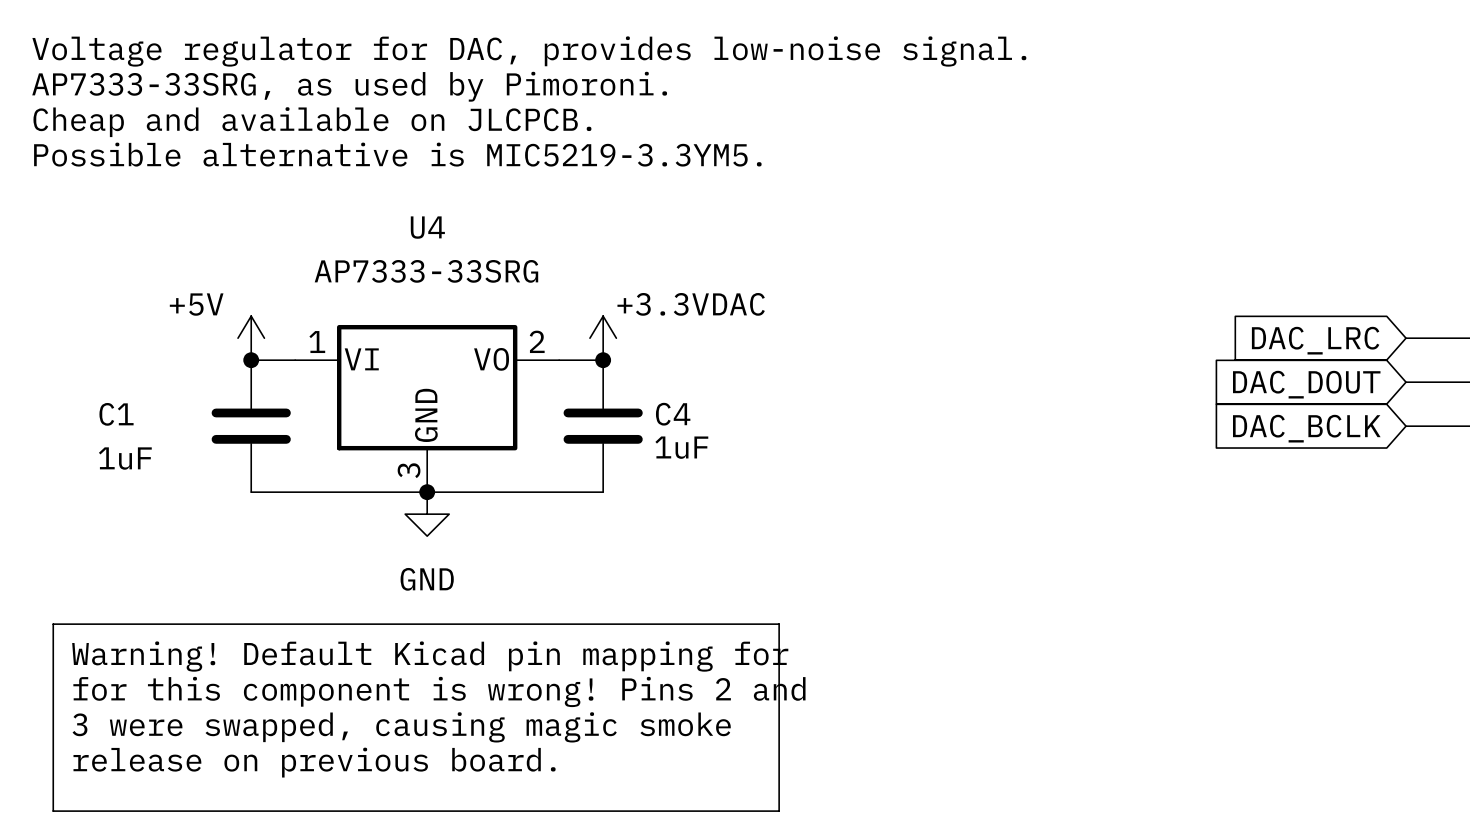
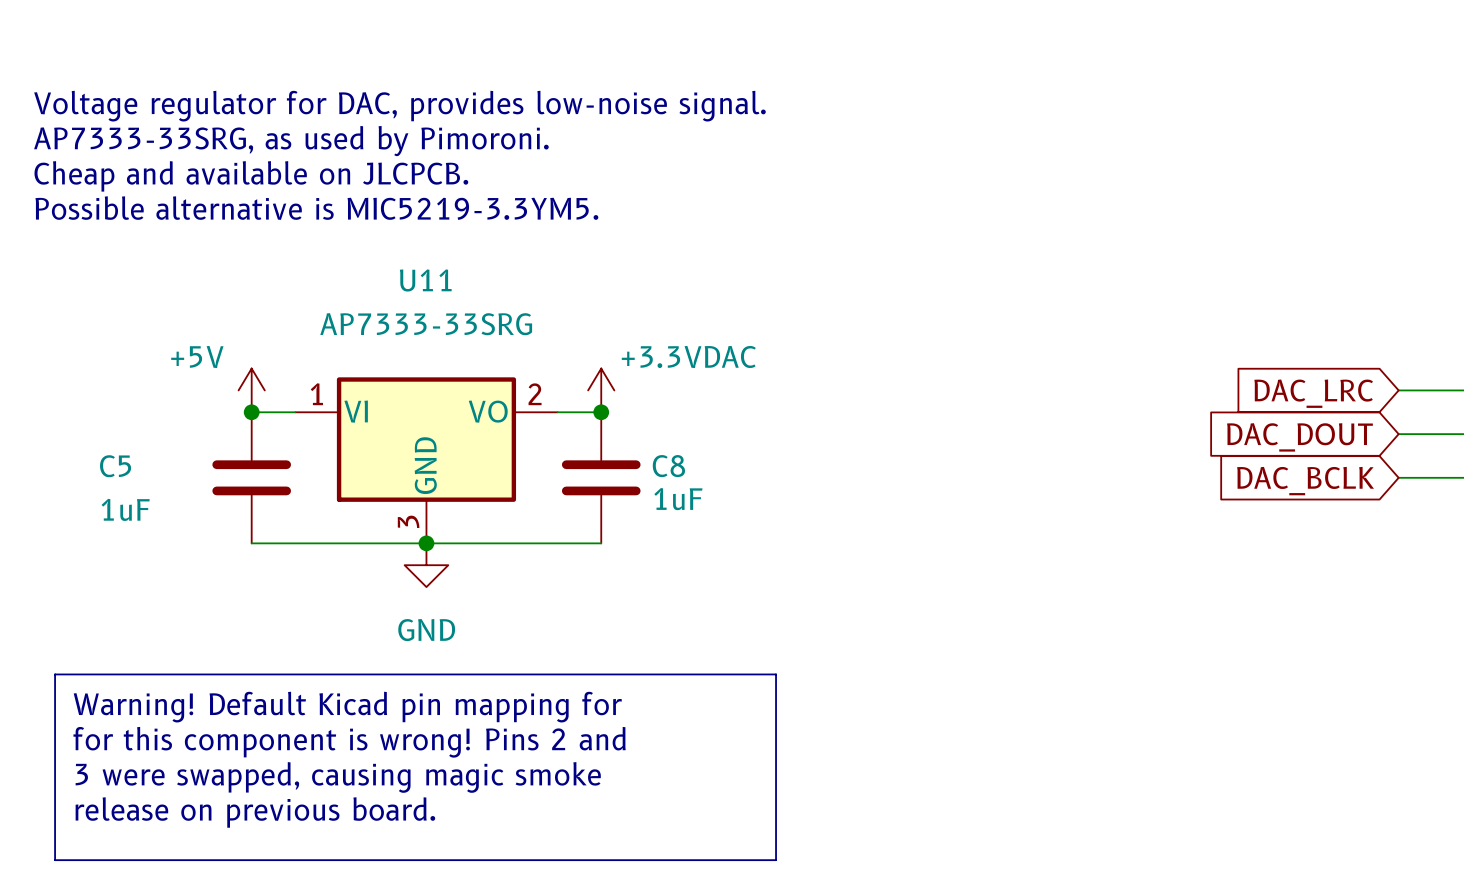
U4 name: U4 (427, 227) -> U11 (425, 280)
C1 name: C1 (116, 414) -> C5 (115, 466)
C4 name: C4 (673, 414) -> C8 (668, 466)

